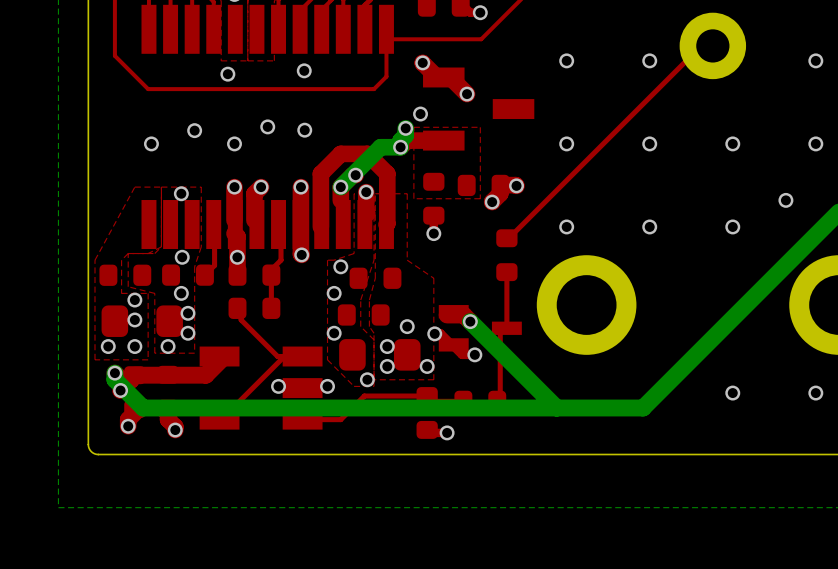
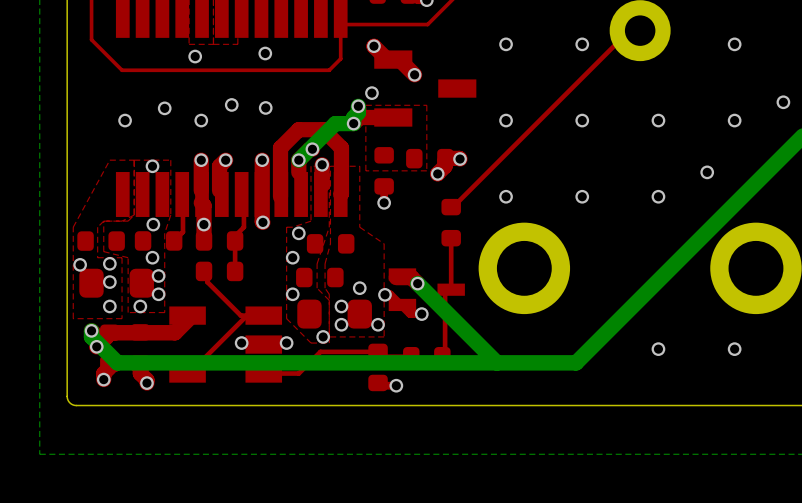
via position: (108, 346) -> (80, 264)

